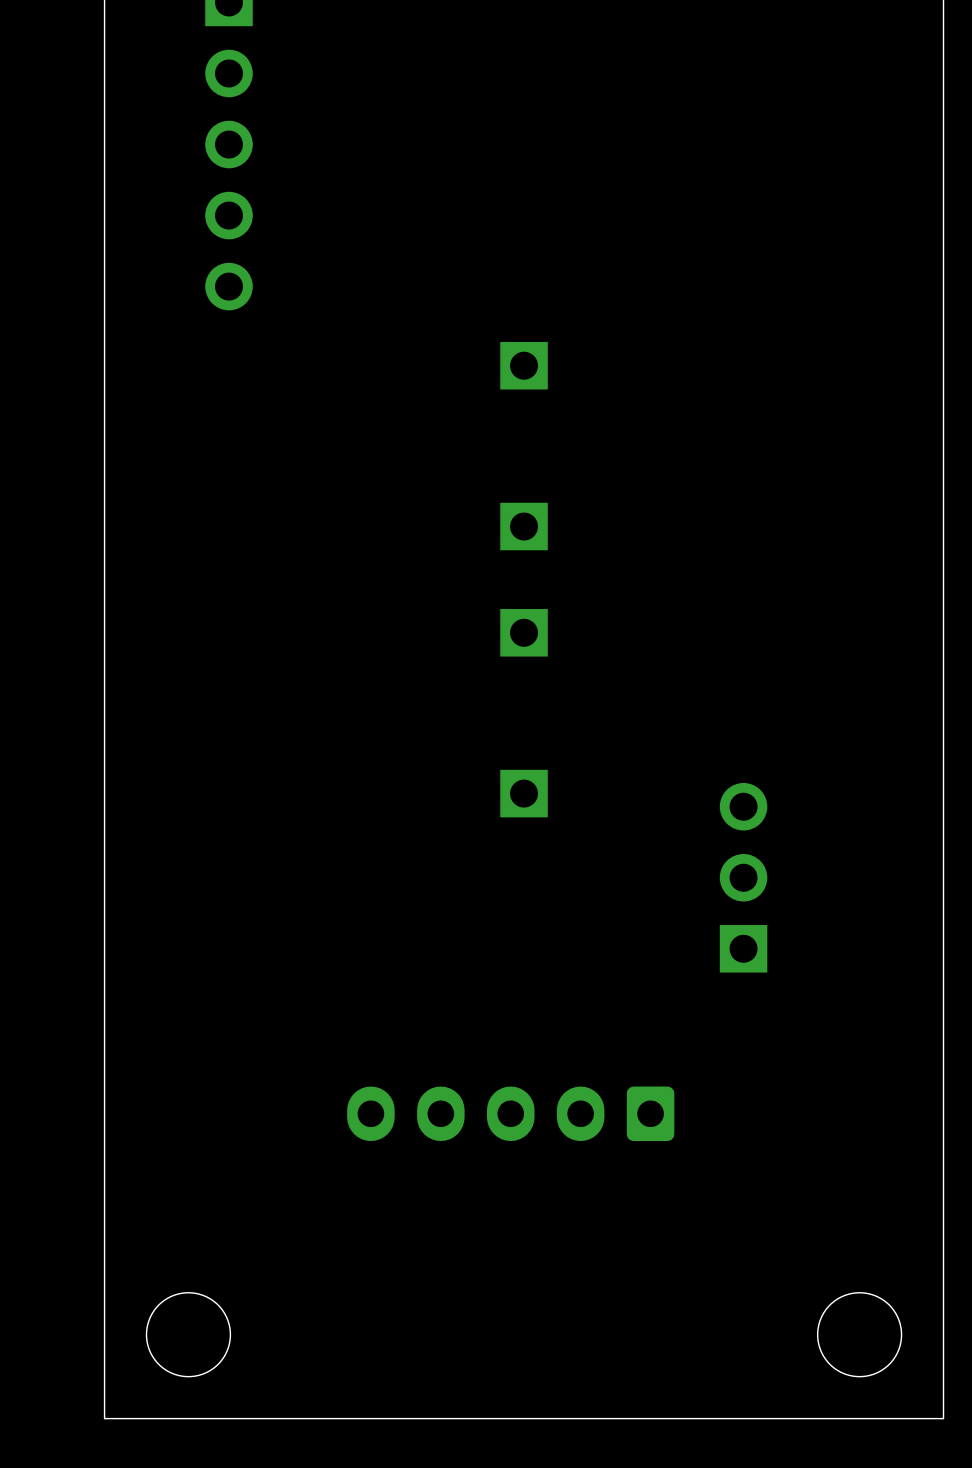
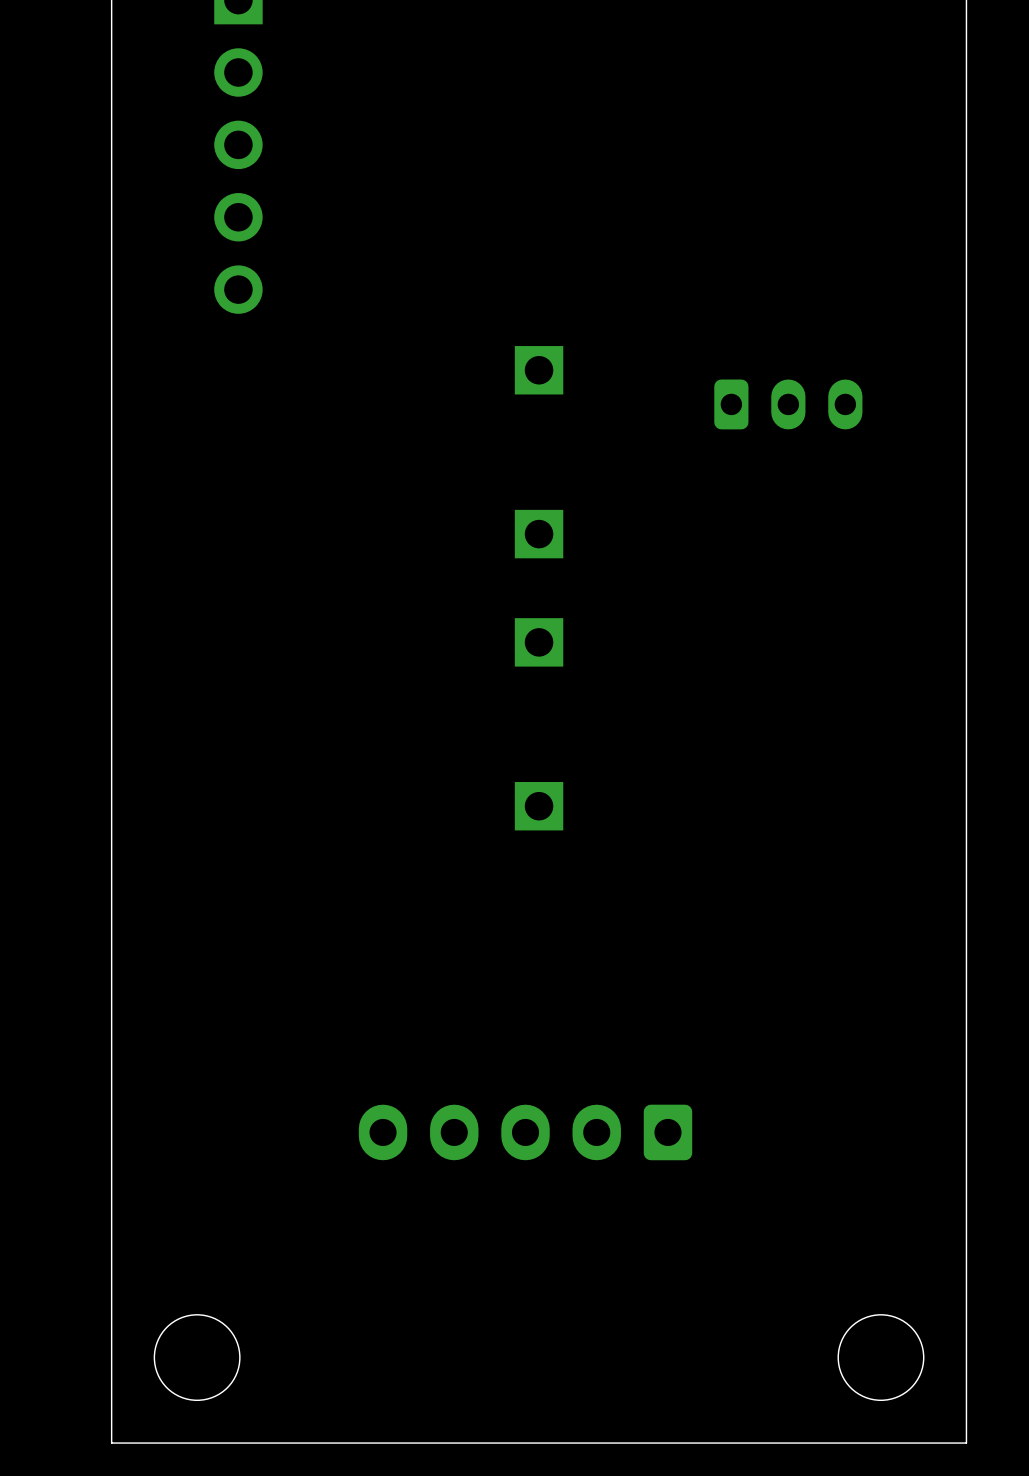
part: none -> (788, 404)
part: (743, 877) -> none

